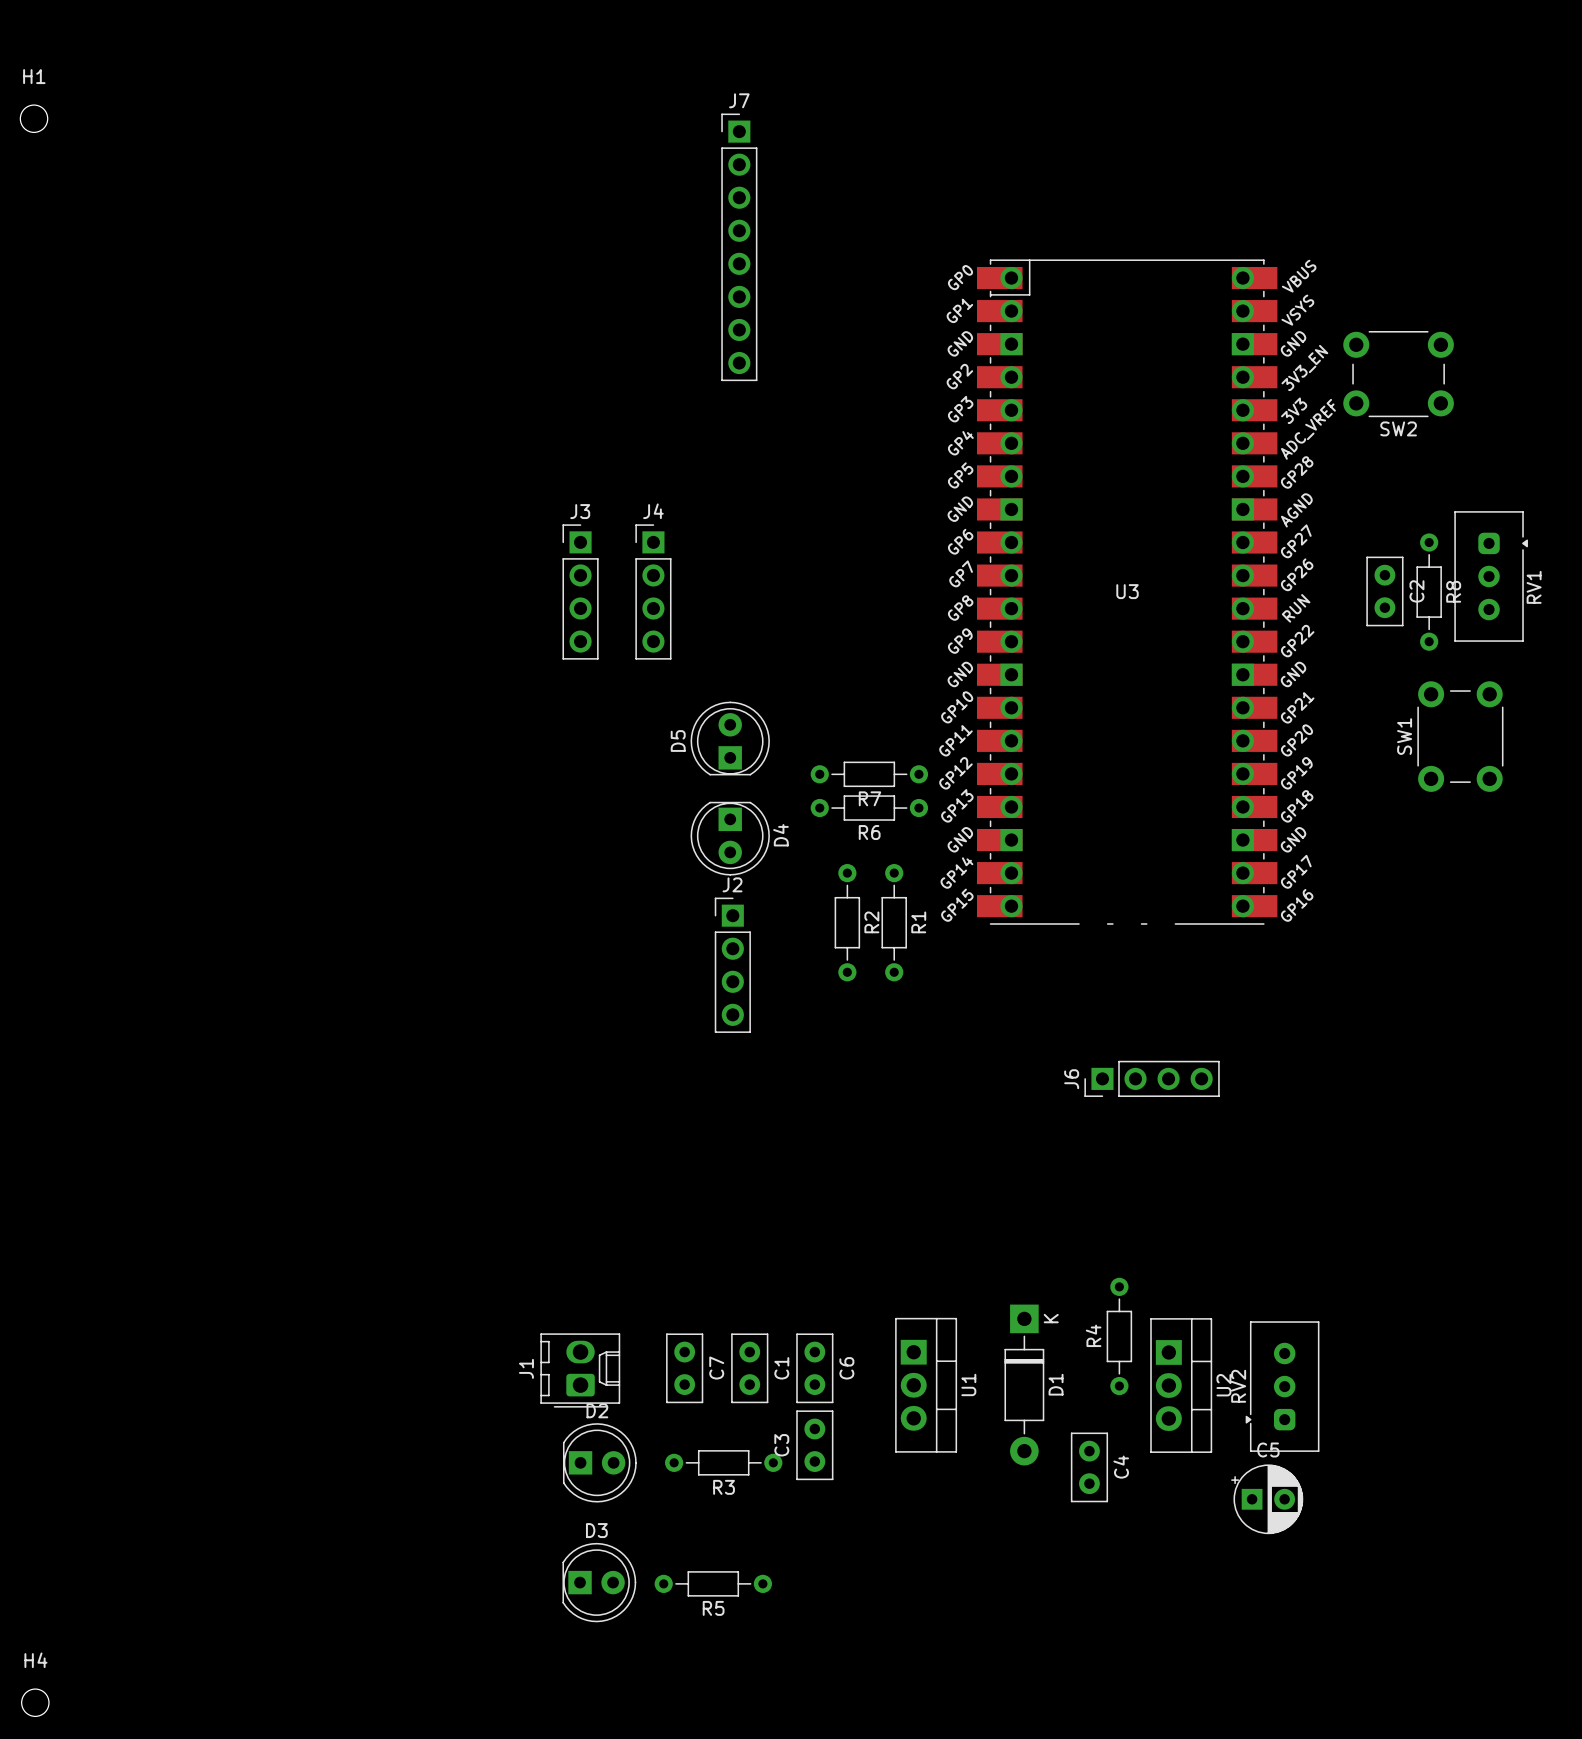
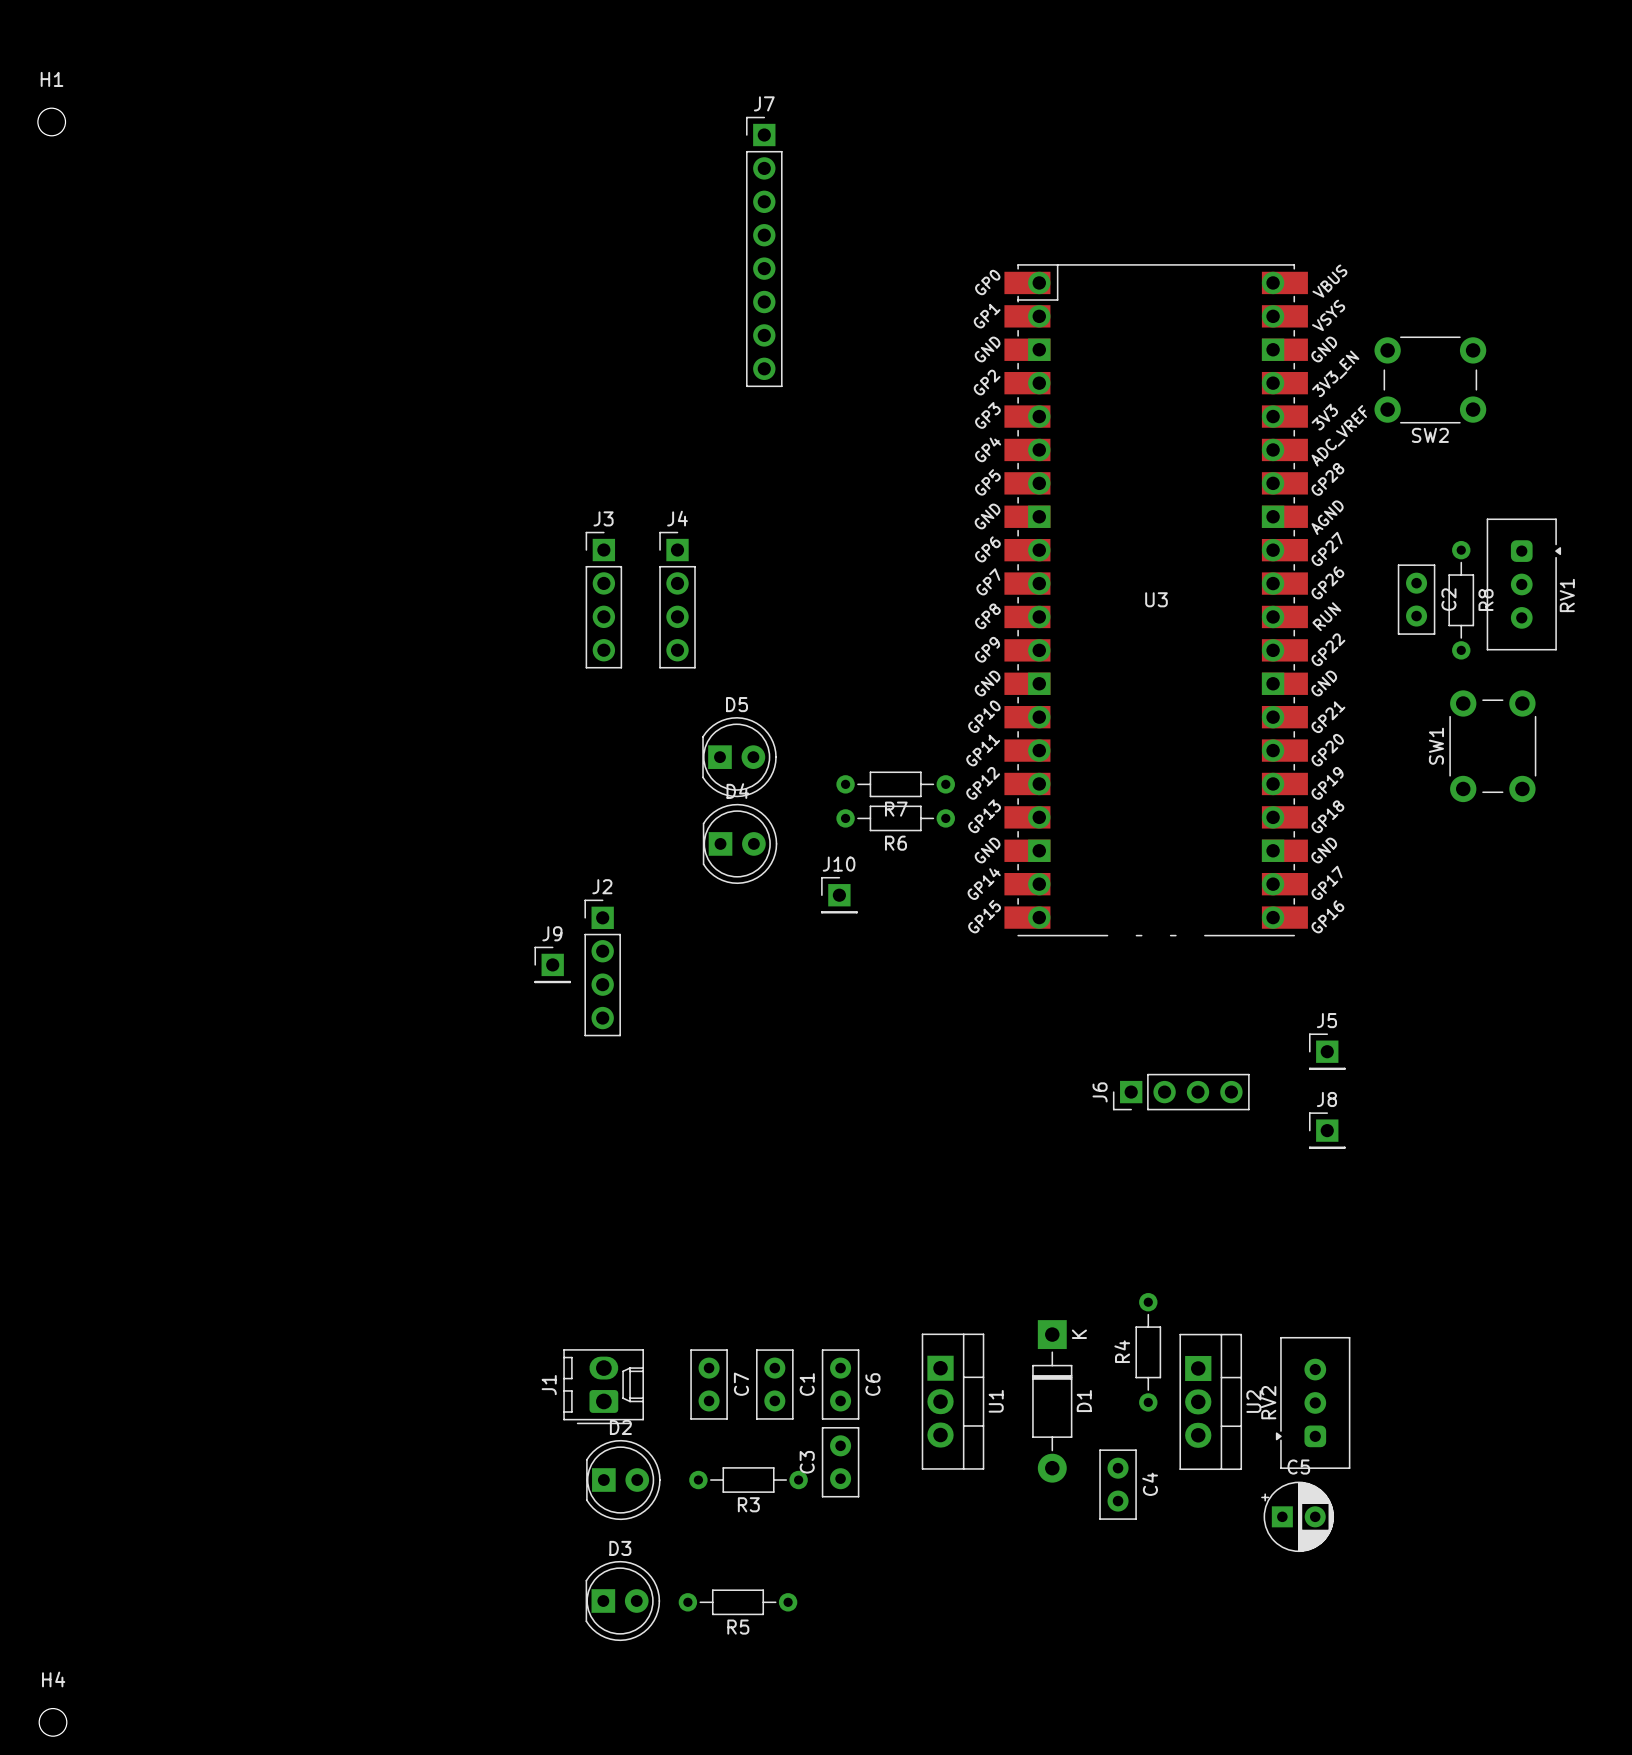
D5 rotation: 0° (730, 738) -> 90° clockwise (739, 757)
D4 rotation: 0° (730, 838) -> 90° counterclockwise (740, 843)
J10: none -> (839, 895)
R2: (847, 922) -> none
R1: (894, 922) -> none
J9: none -> (552, 964)
J2 position: (732, 965) -> (602, 967)
J5: none -> (1327, 1051)
J8: none -> (1327, 1130)

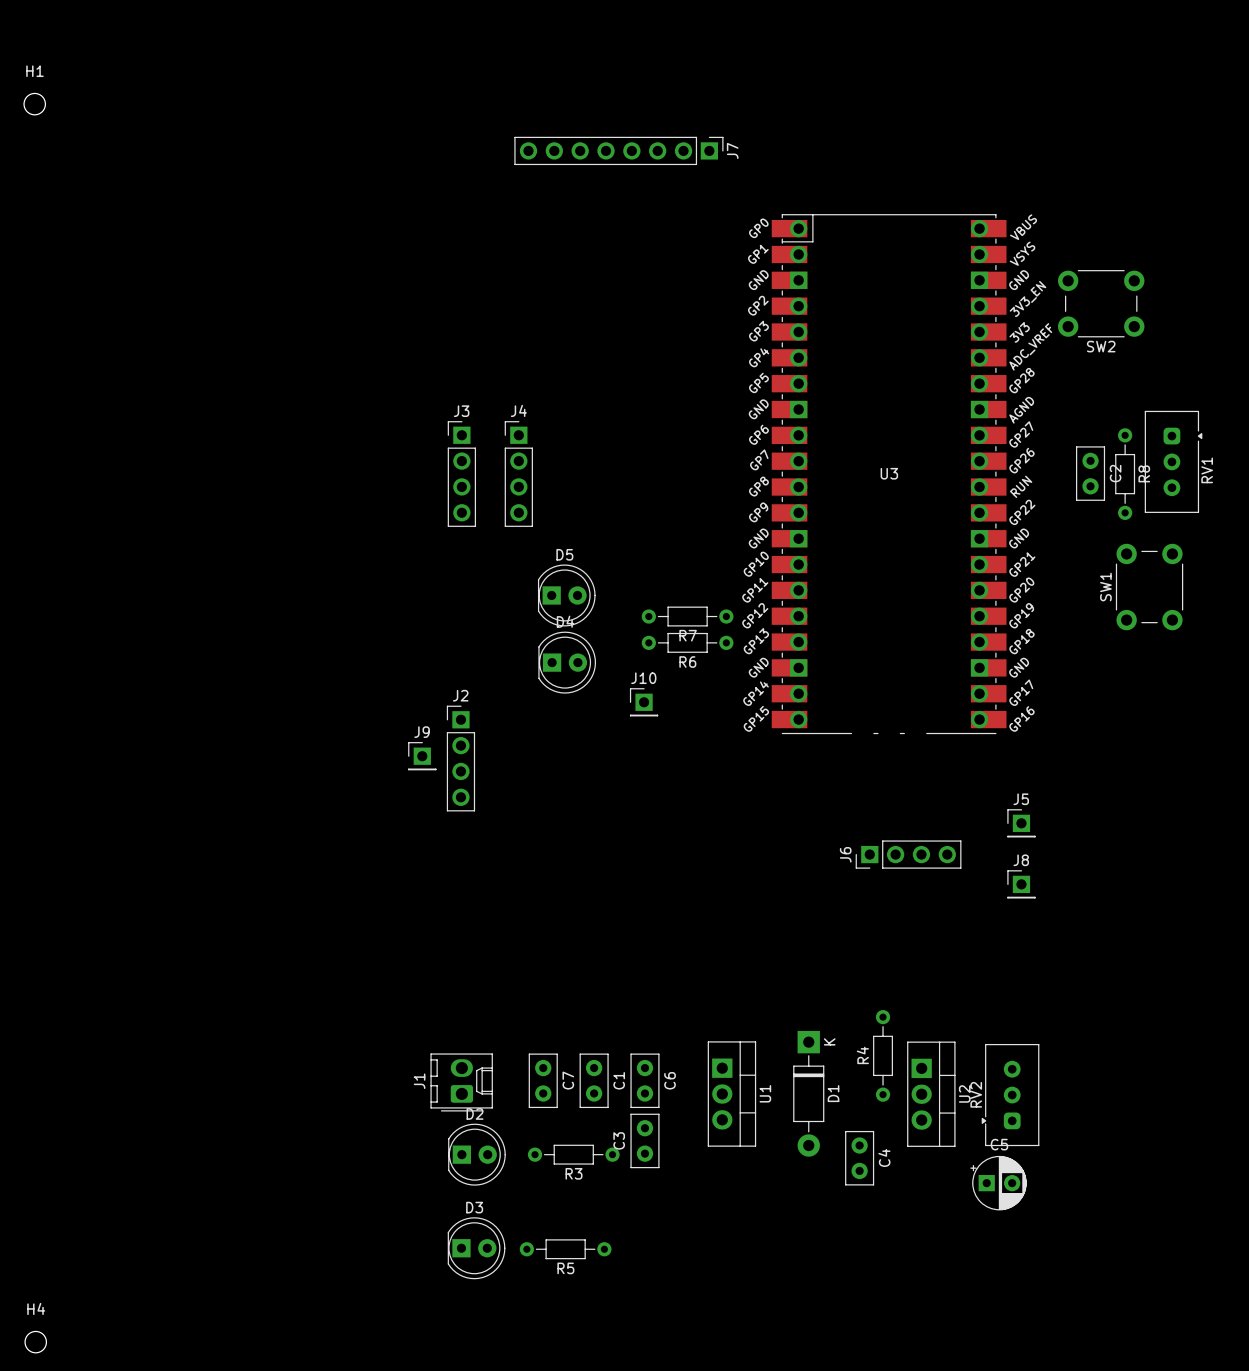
J7 rotation: 0° (764, 251) -> 90° clockwise (618, 150)

